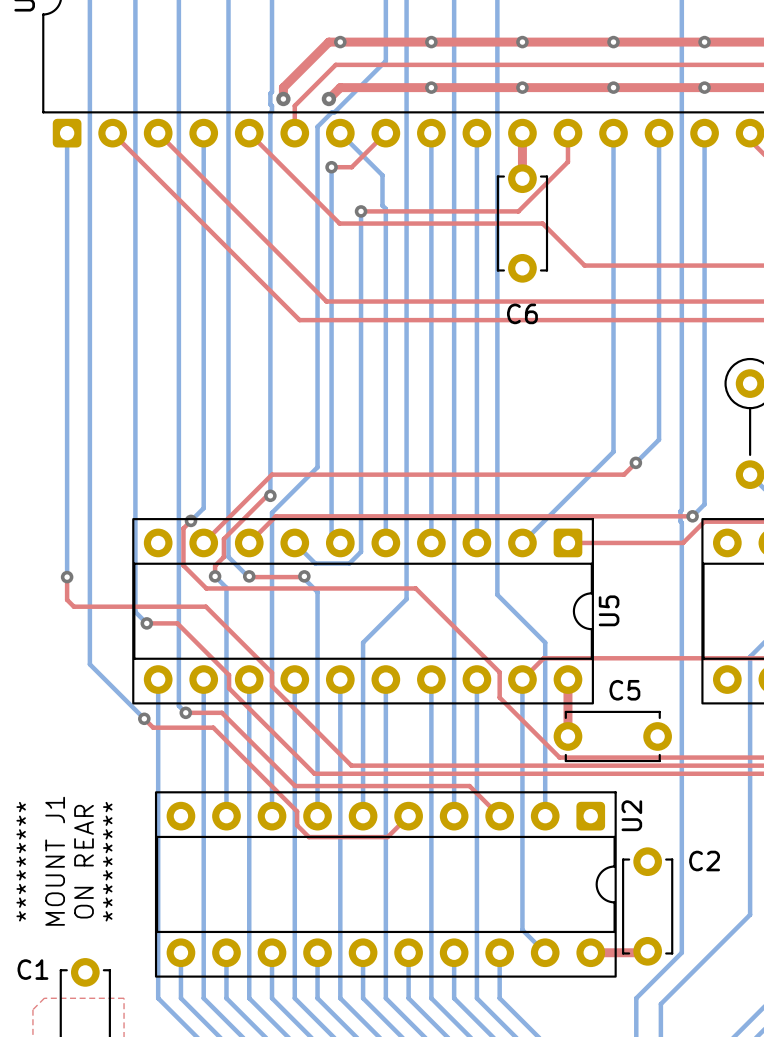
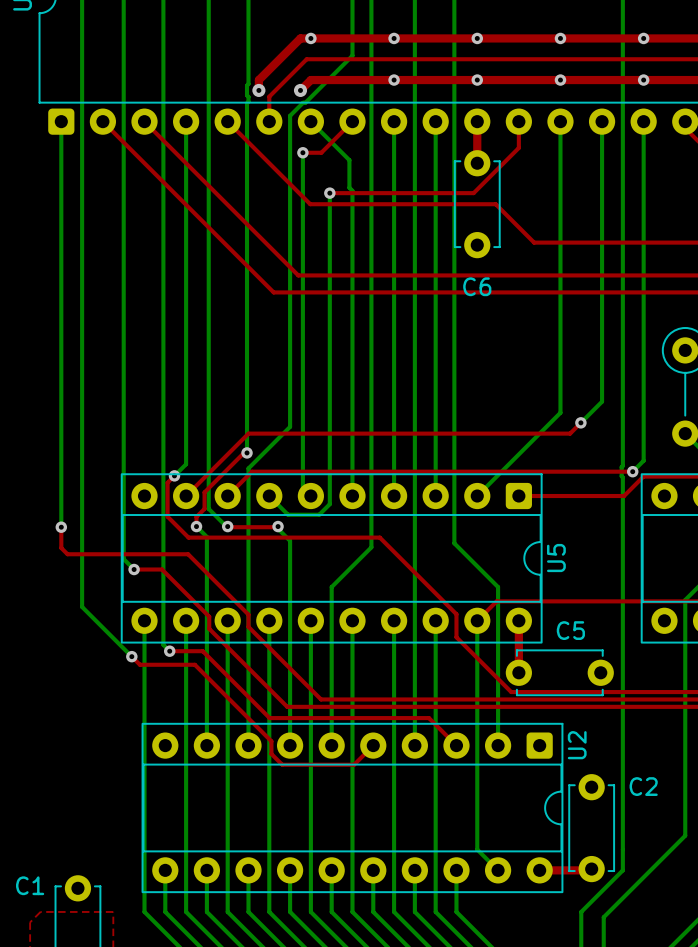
text: ********* (21, 861) -> none
text: MOUNT J1 (55, 861) -> none
text: ON REAR (84, 861) -> none
text: ********* (107, 861) -> none

